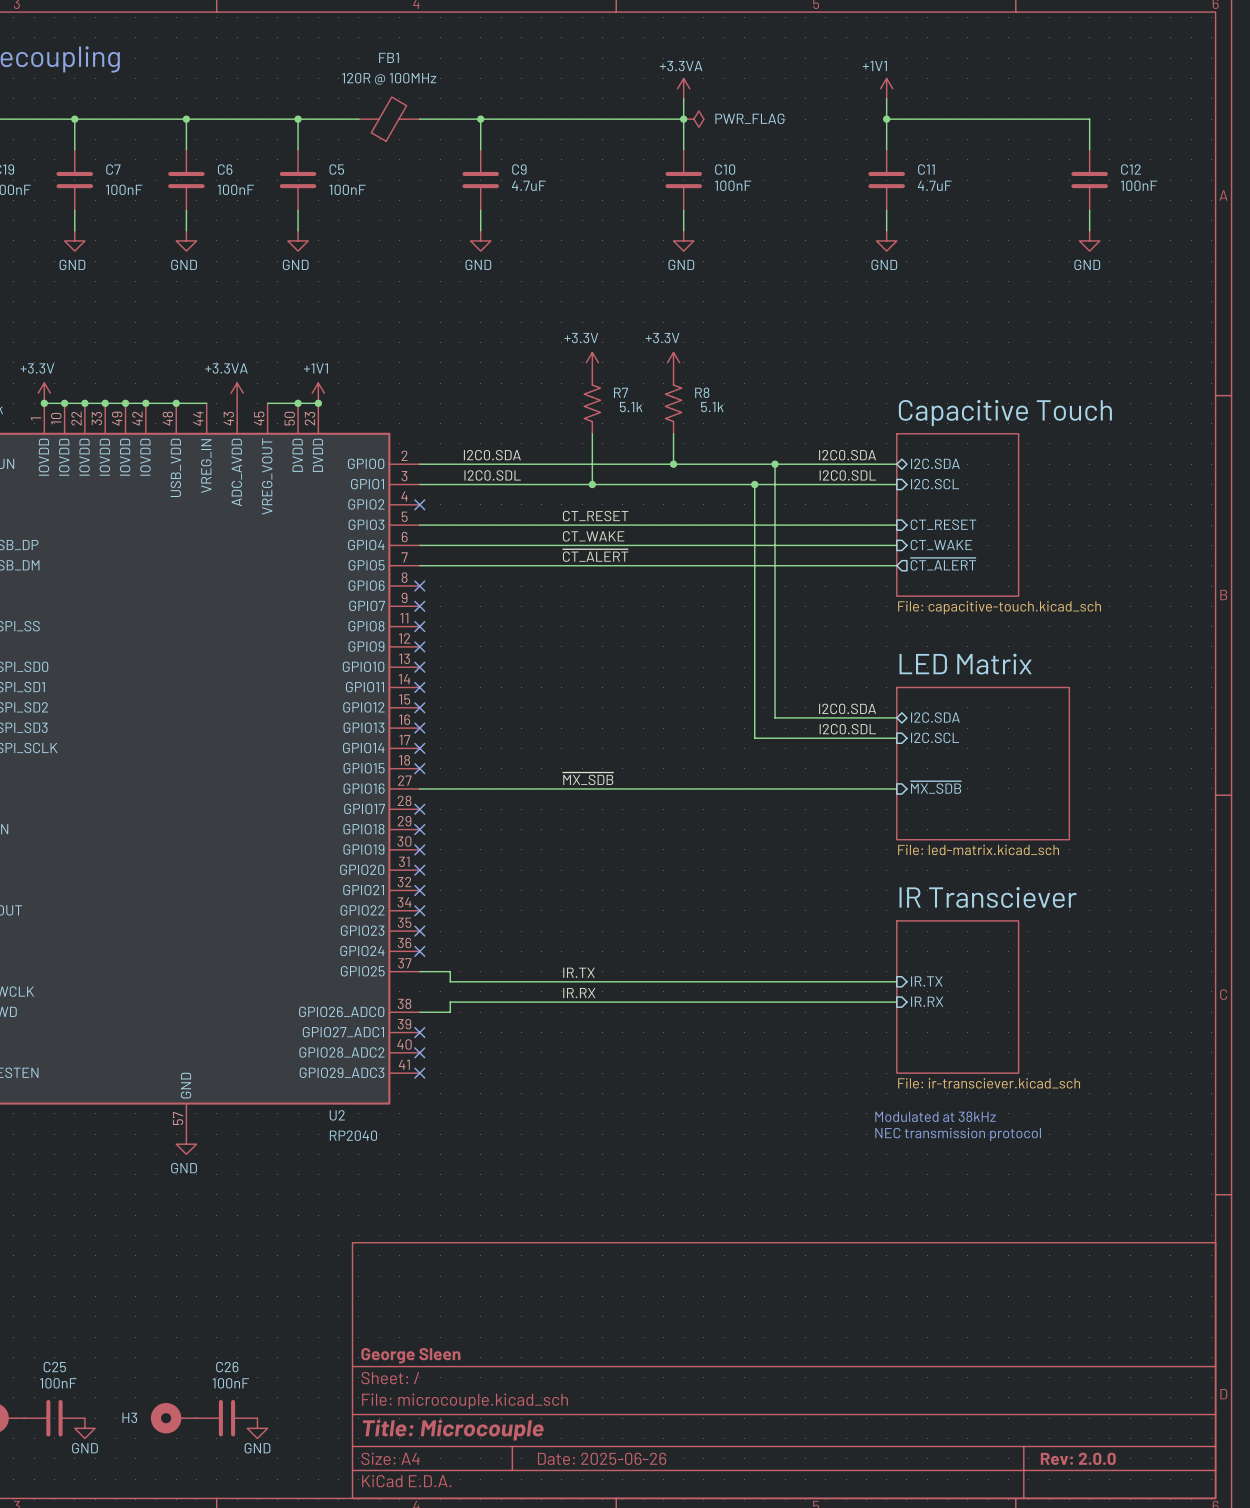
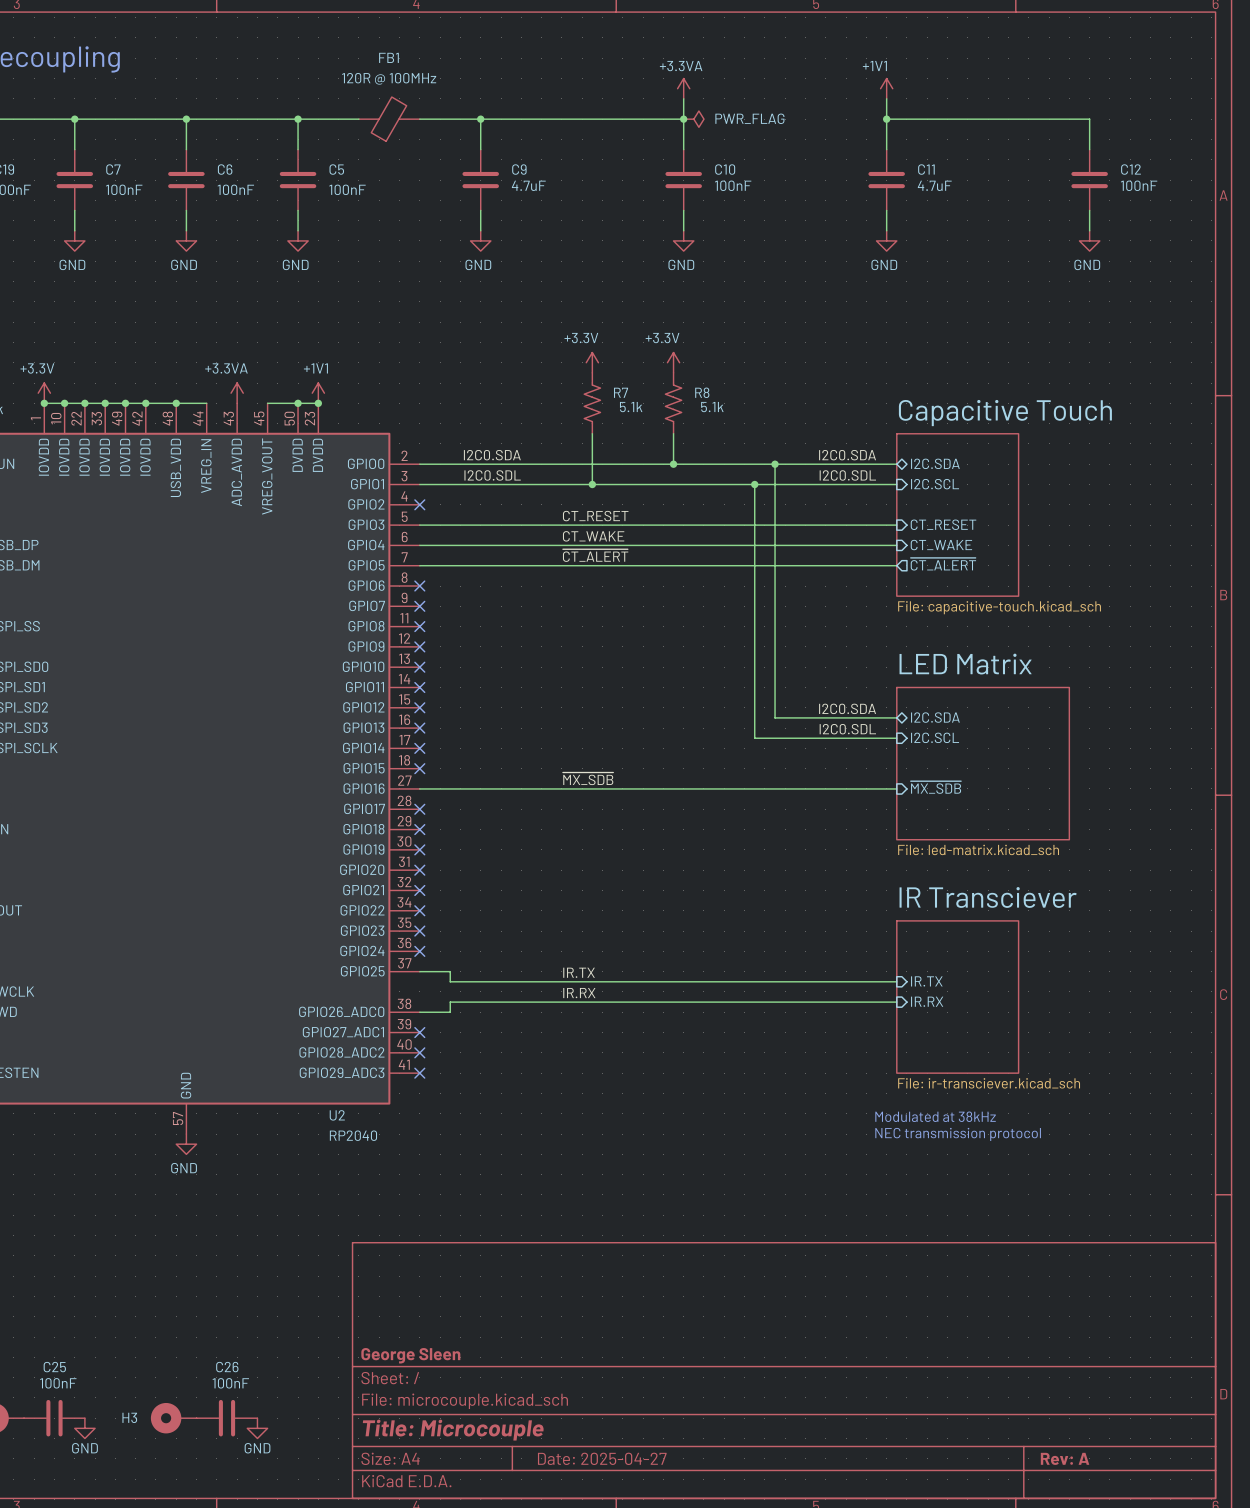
title block: Date: 2025-06-26 (602, 1458) -> Date: 2025-04-27 (602, 1458)
title block: Rev: 2.0.0 (1078, 1458) -> Rev: A (1065, 1458)

